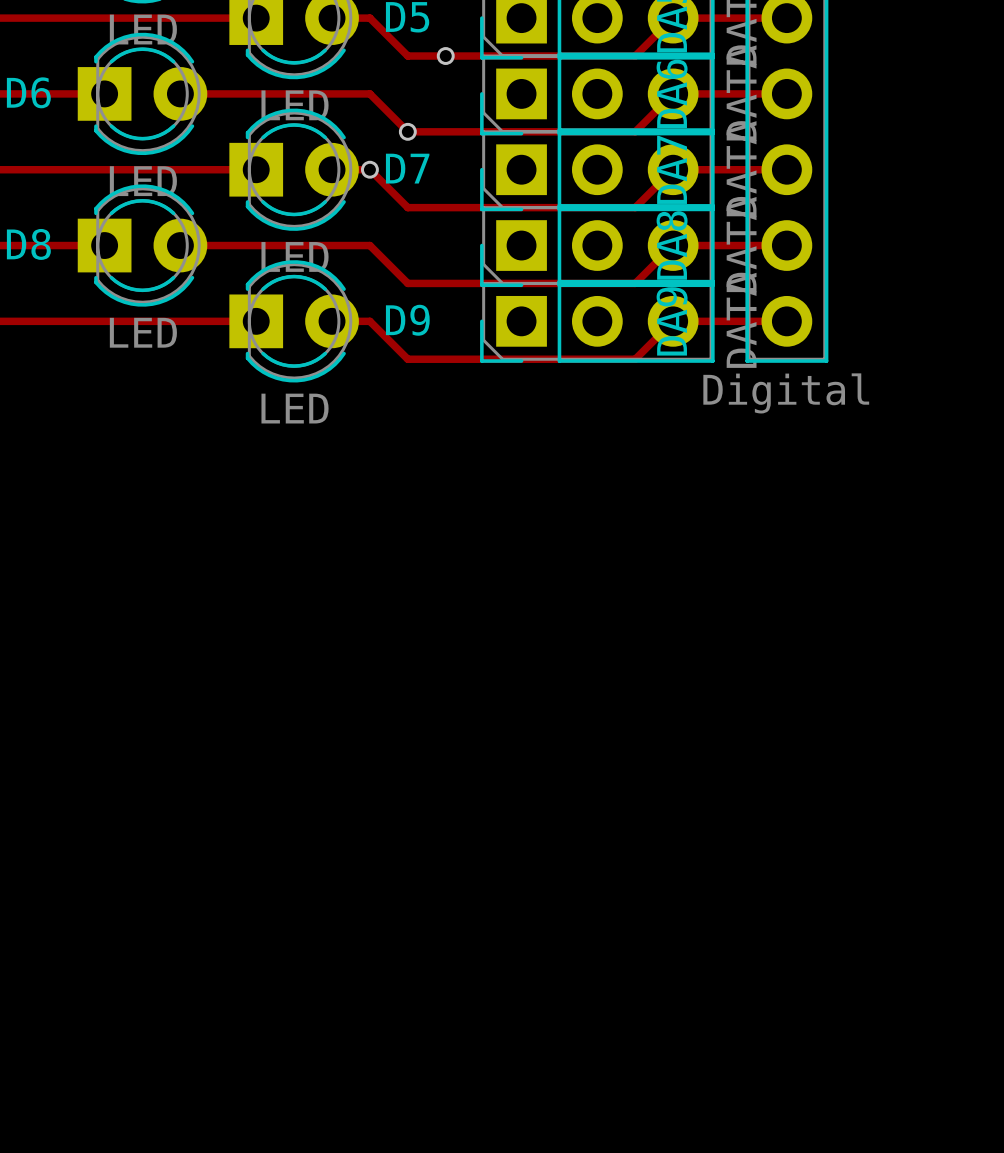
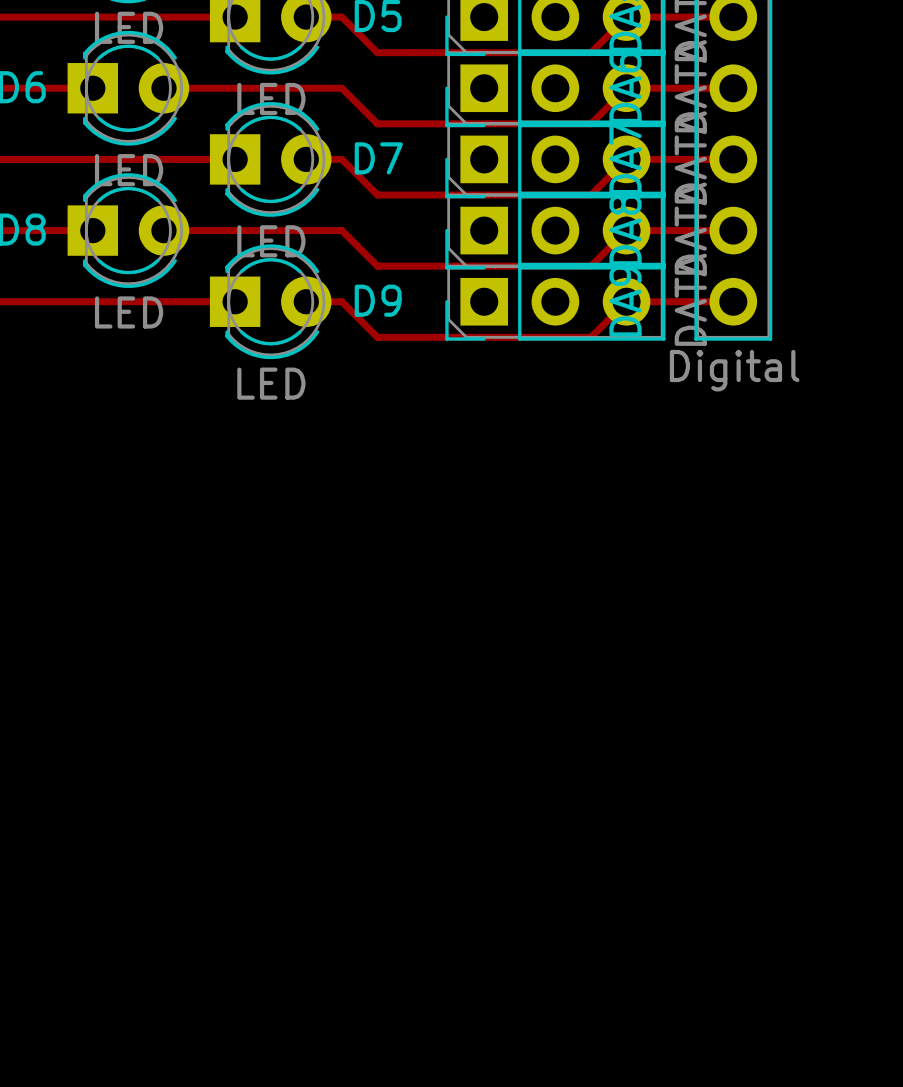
via: (445, 56) -> none
via: (407, 131) -> none
via: (369, 169) -> none

